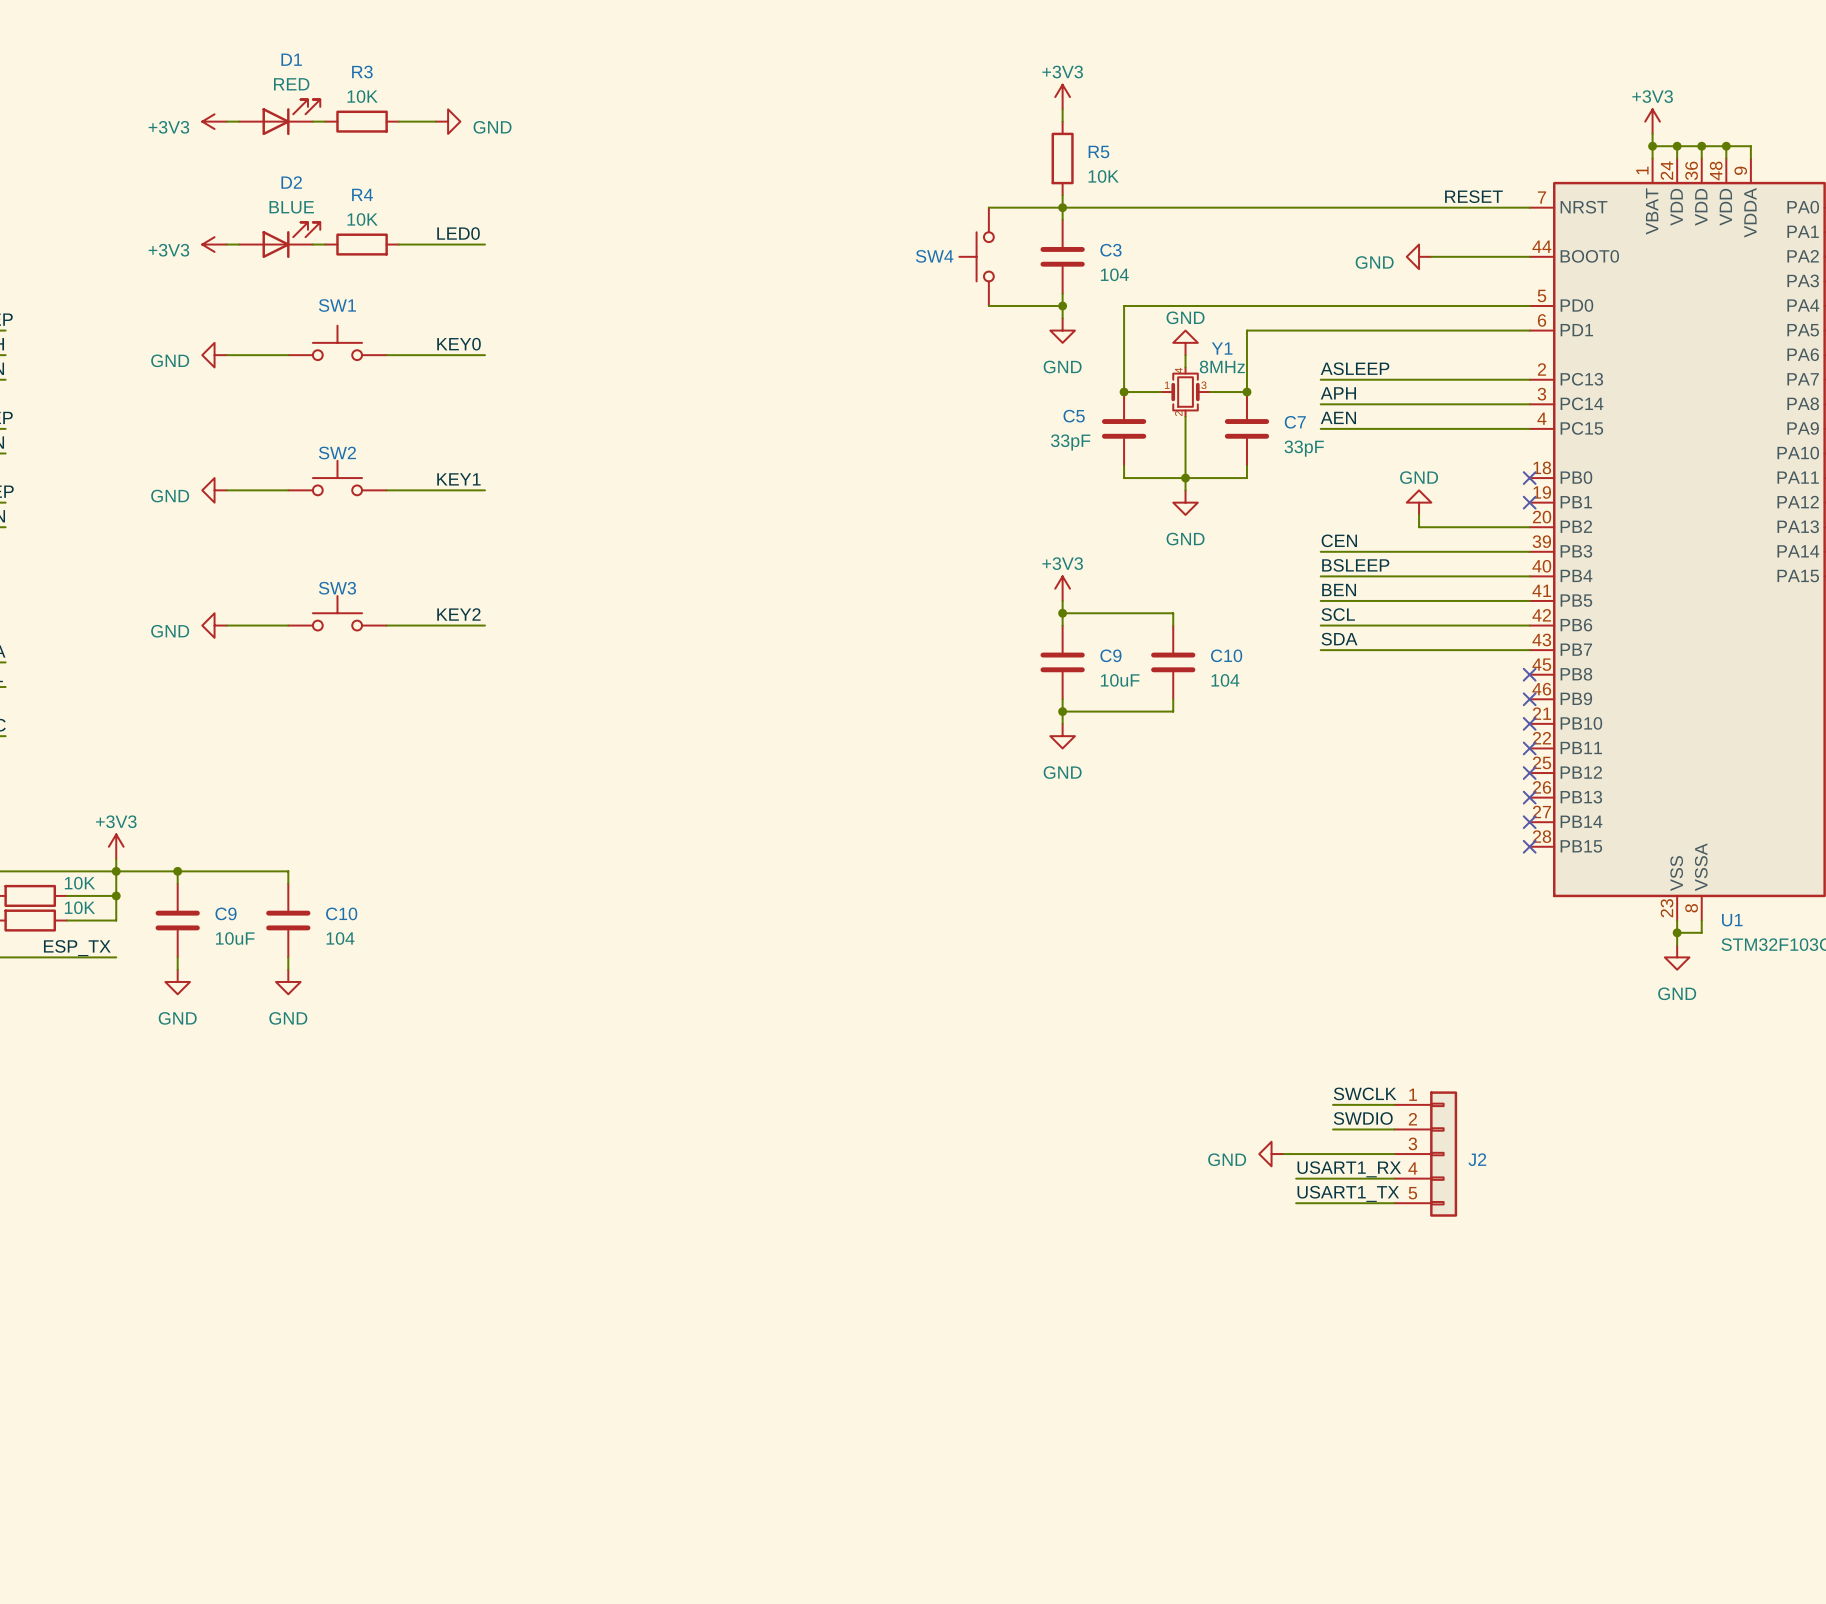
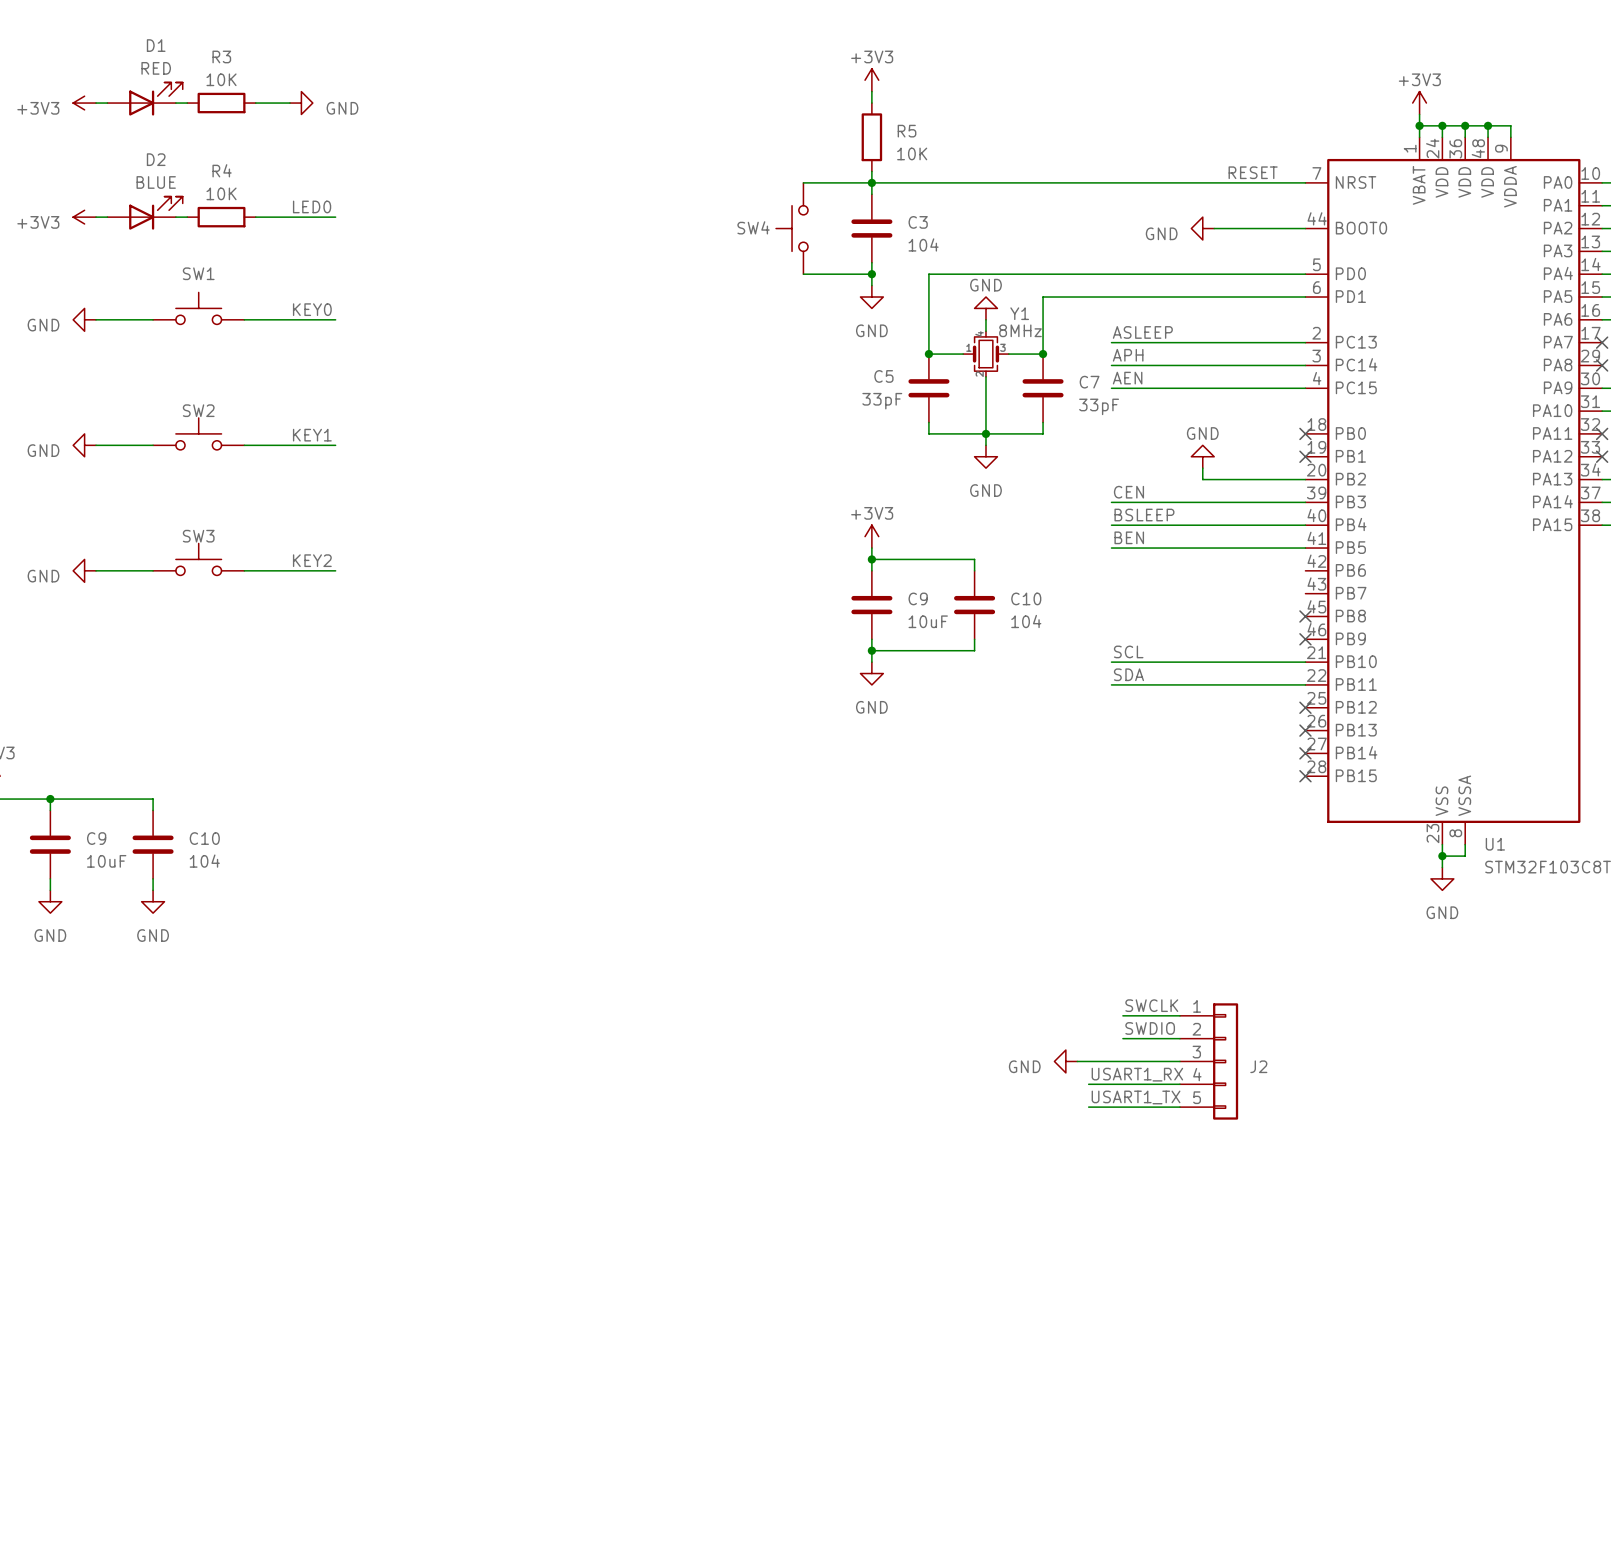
label position: SCL (1338, 614) -> SCL (1128, 651)
wire: (1320, 625) (1529, 625) -> (1111, 684) (1305, 684)
label position: SDA (1339, 639) -> SDA (1128, 674)
wire: (1320, 650) (1529, 650) -> (1111, 662) (1305, 662)
no-connect mark: (1529, 723) -> none
no-connect mark: (1529, 748) -> none

